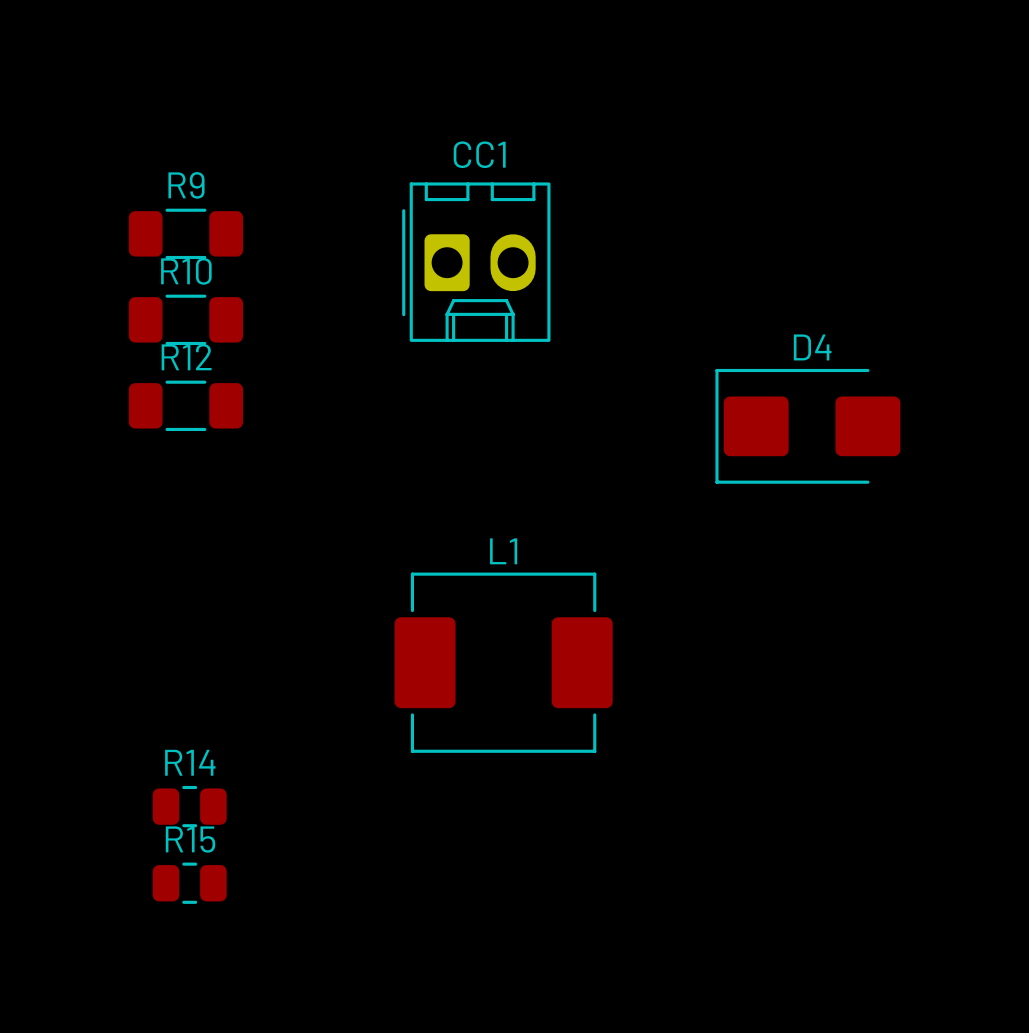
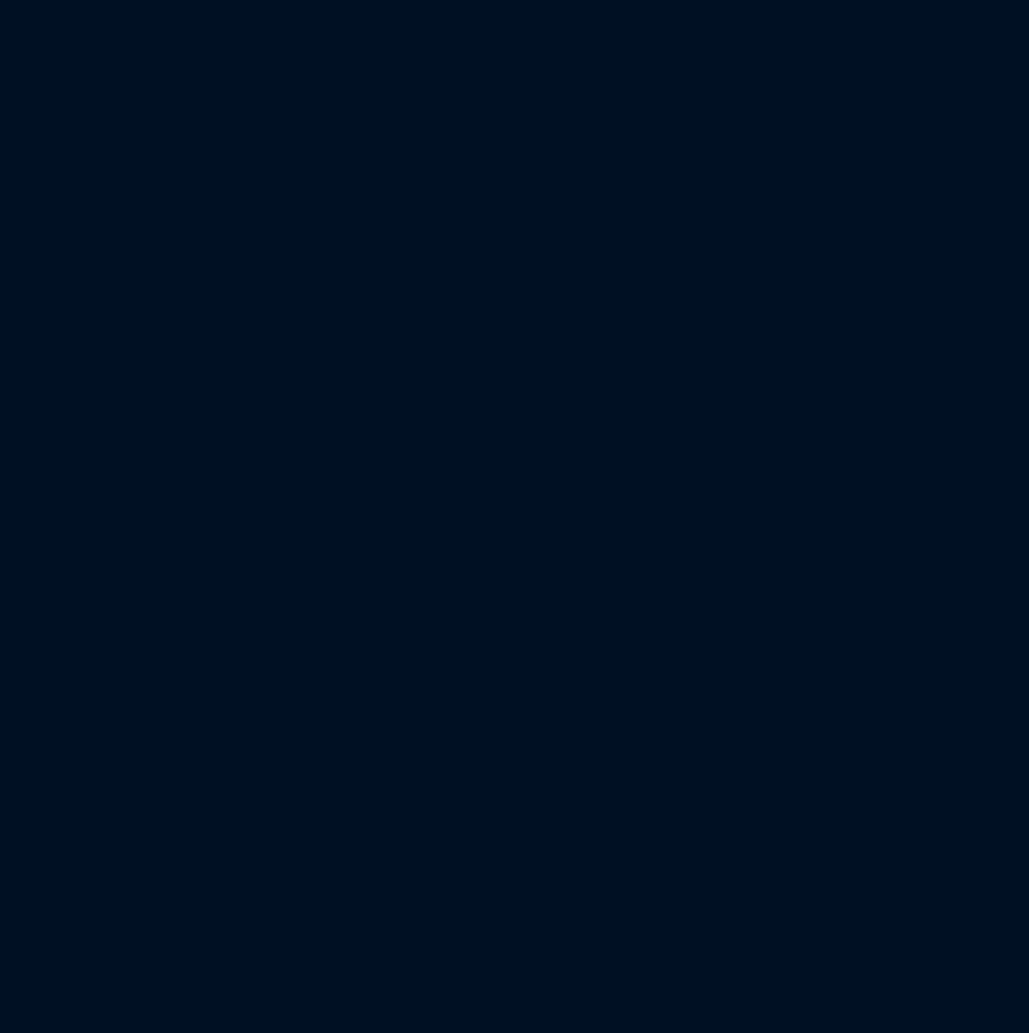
R9: (185, 233) -> none
CC1: (476, 262) -> none
R10: (185, 319) -> none
R12: (185, 405) -> none
D4: (807, 426) -> none
L1: (503, 662) -> none
R14: (189, 806) -> none
R15: (189, 883) -> none

